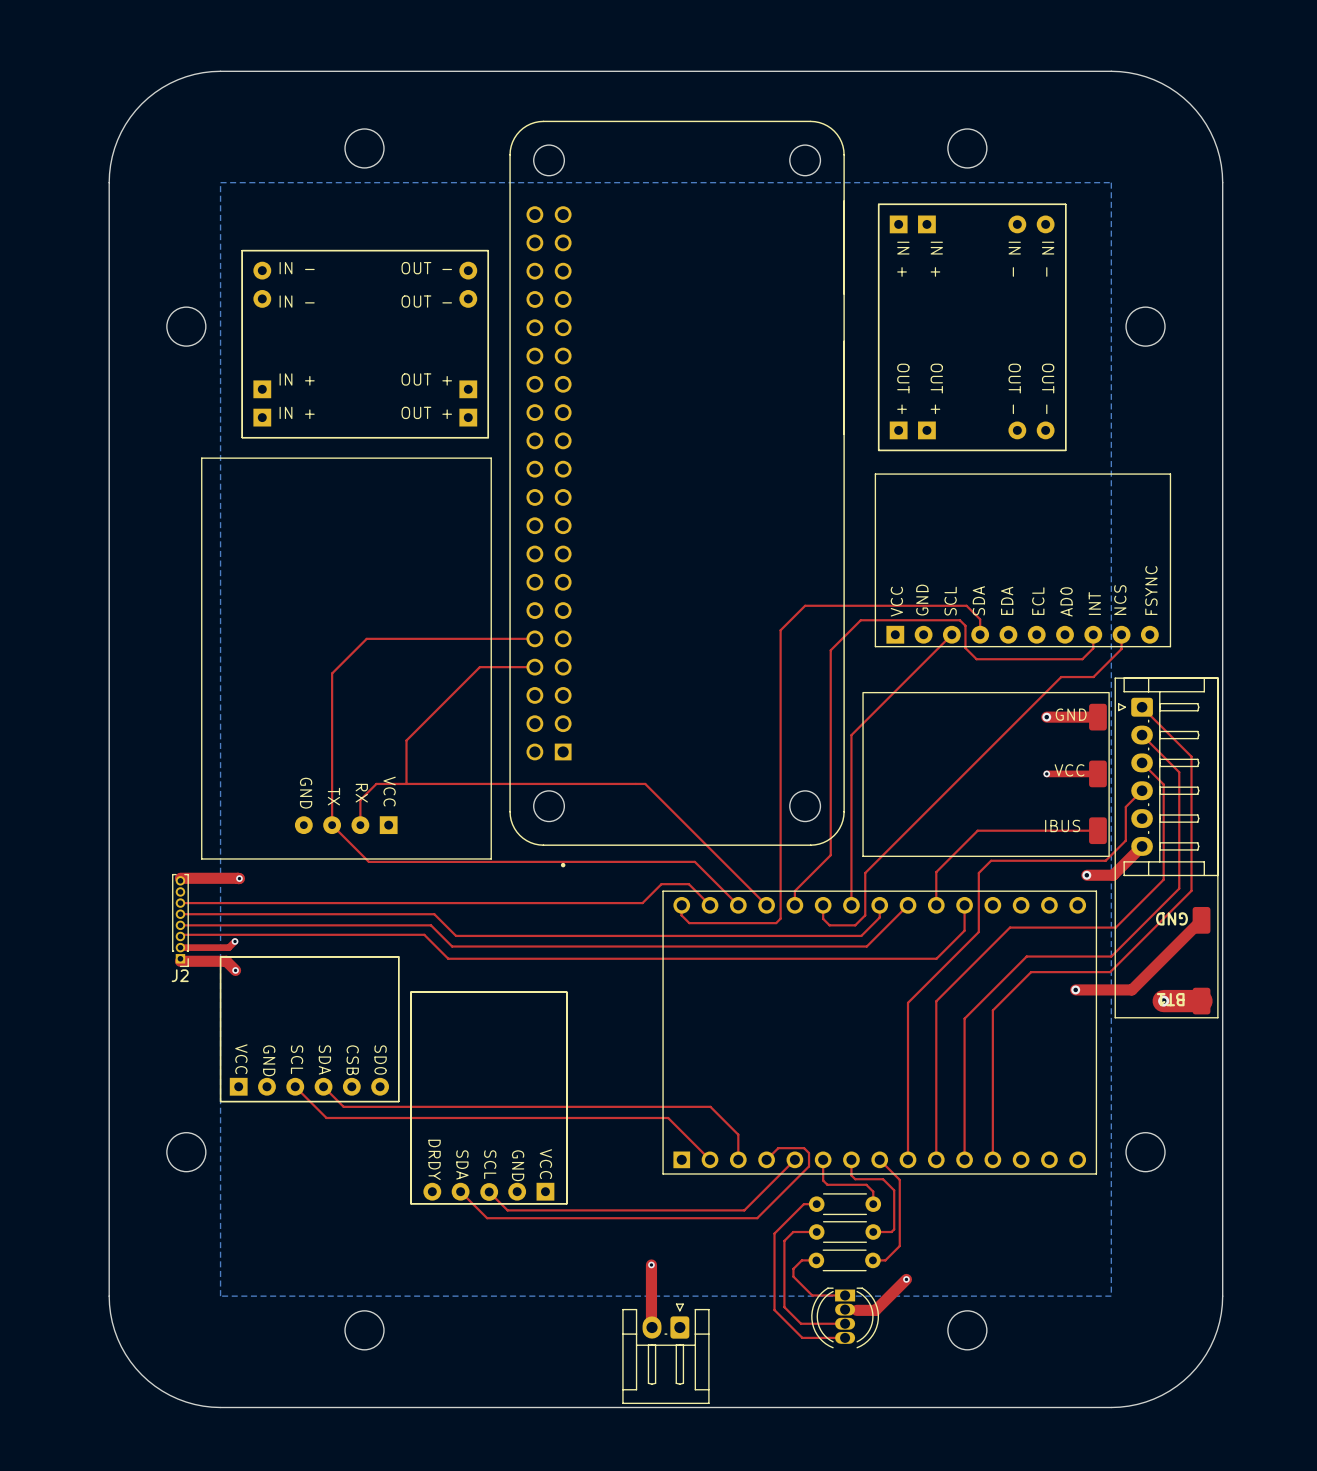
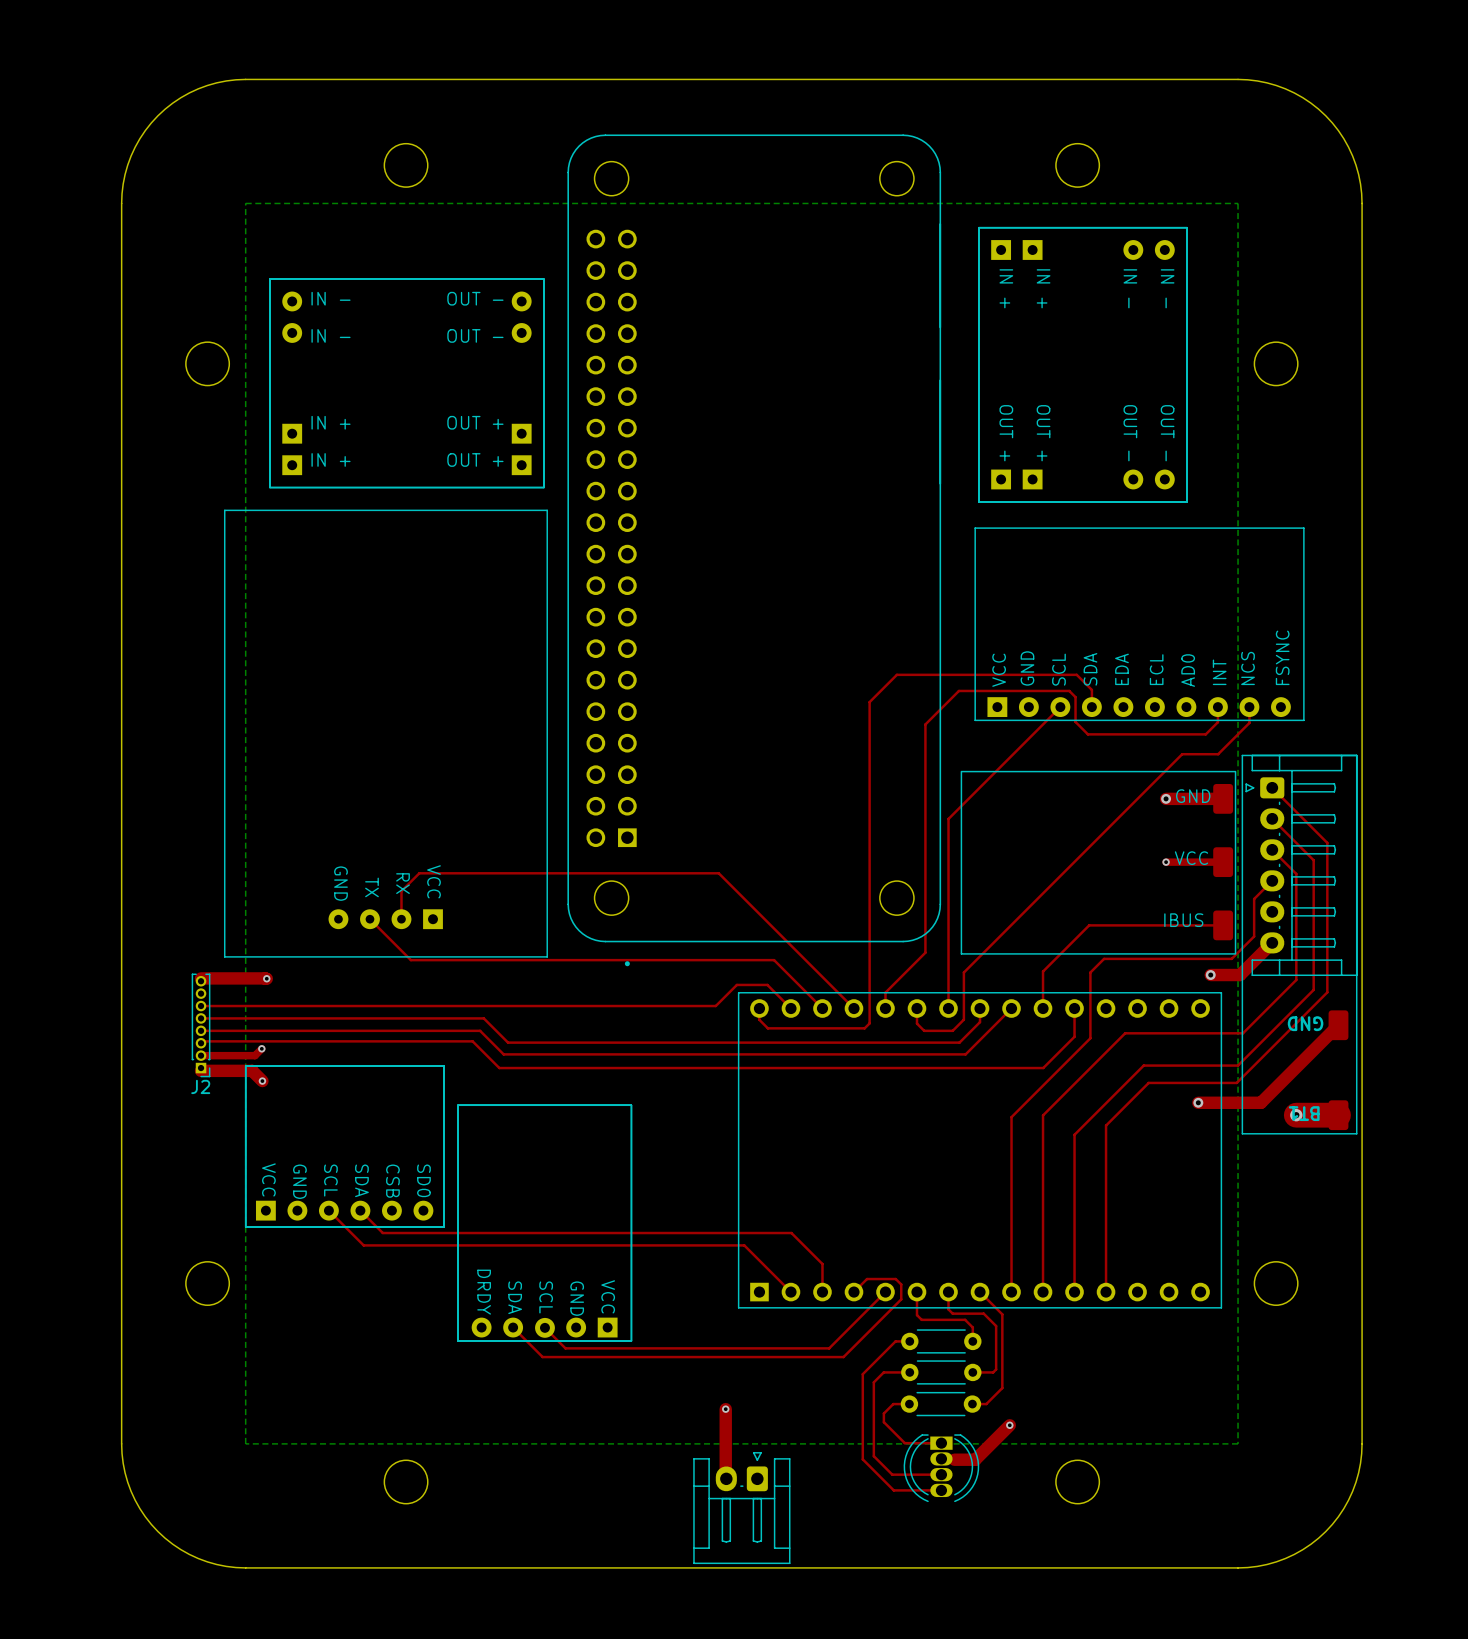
top track: (534, 638) (366, 638) (332, 673) (332, 825) -> none
top track: (534, 667) (479, 667) (406, 740) (406, 783) -> none

